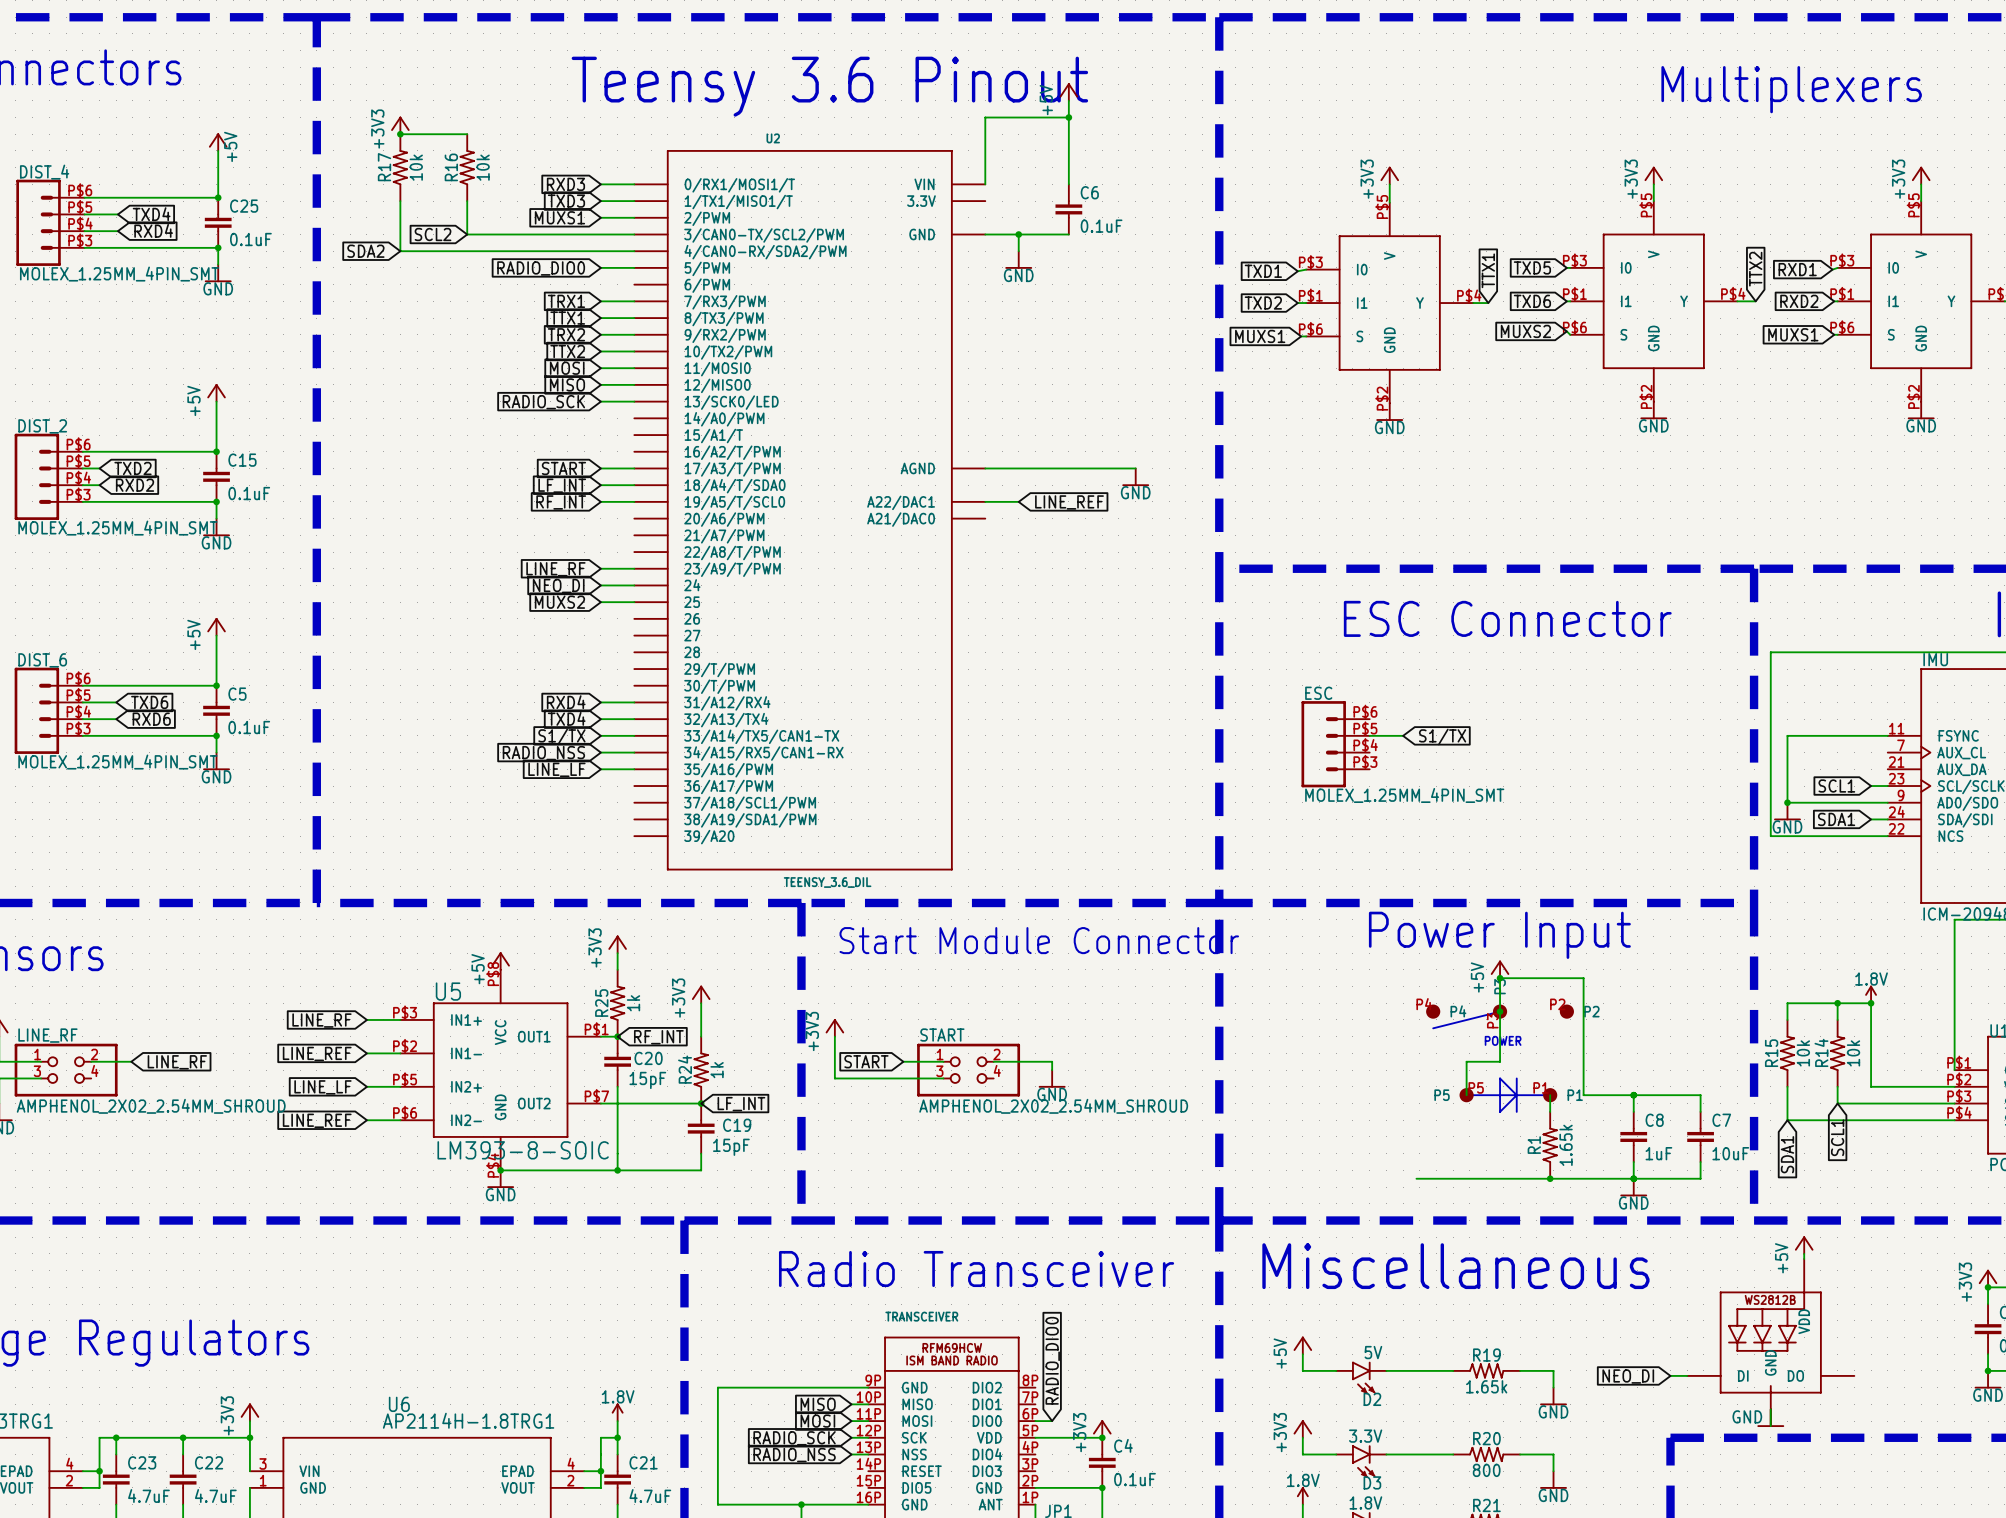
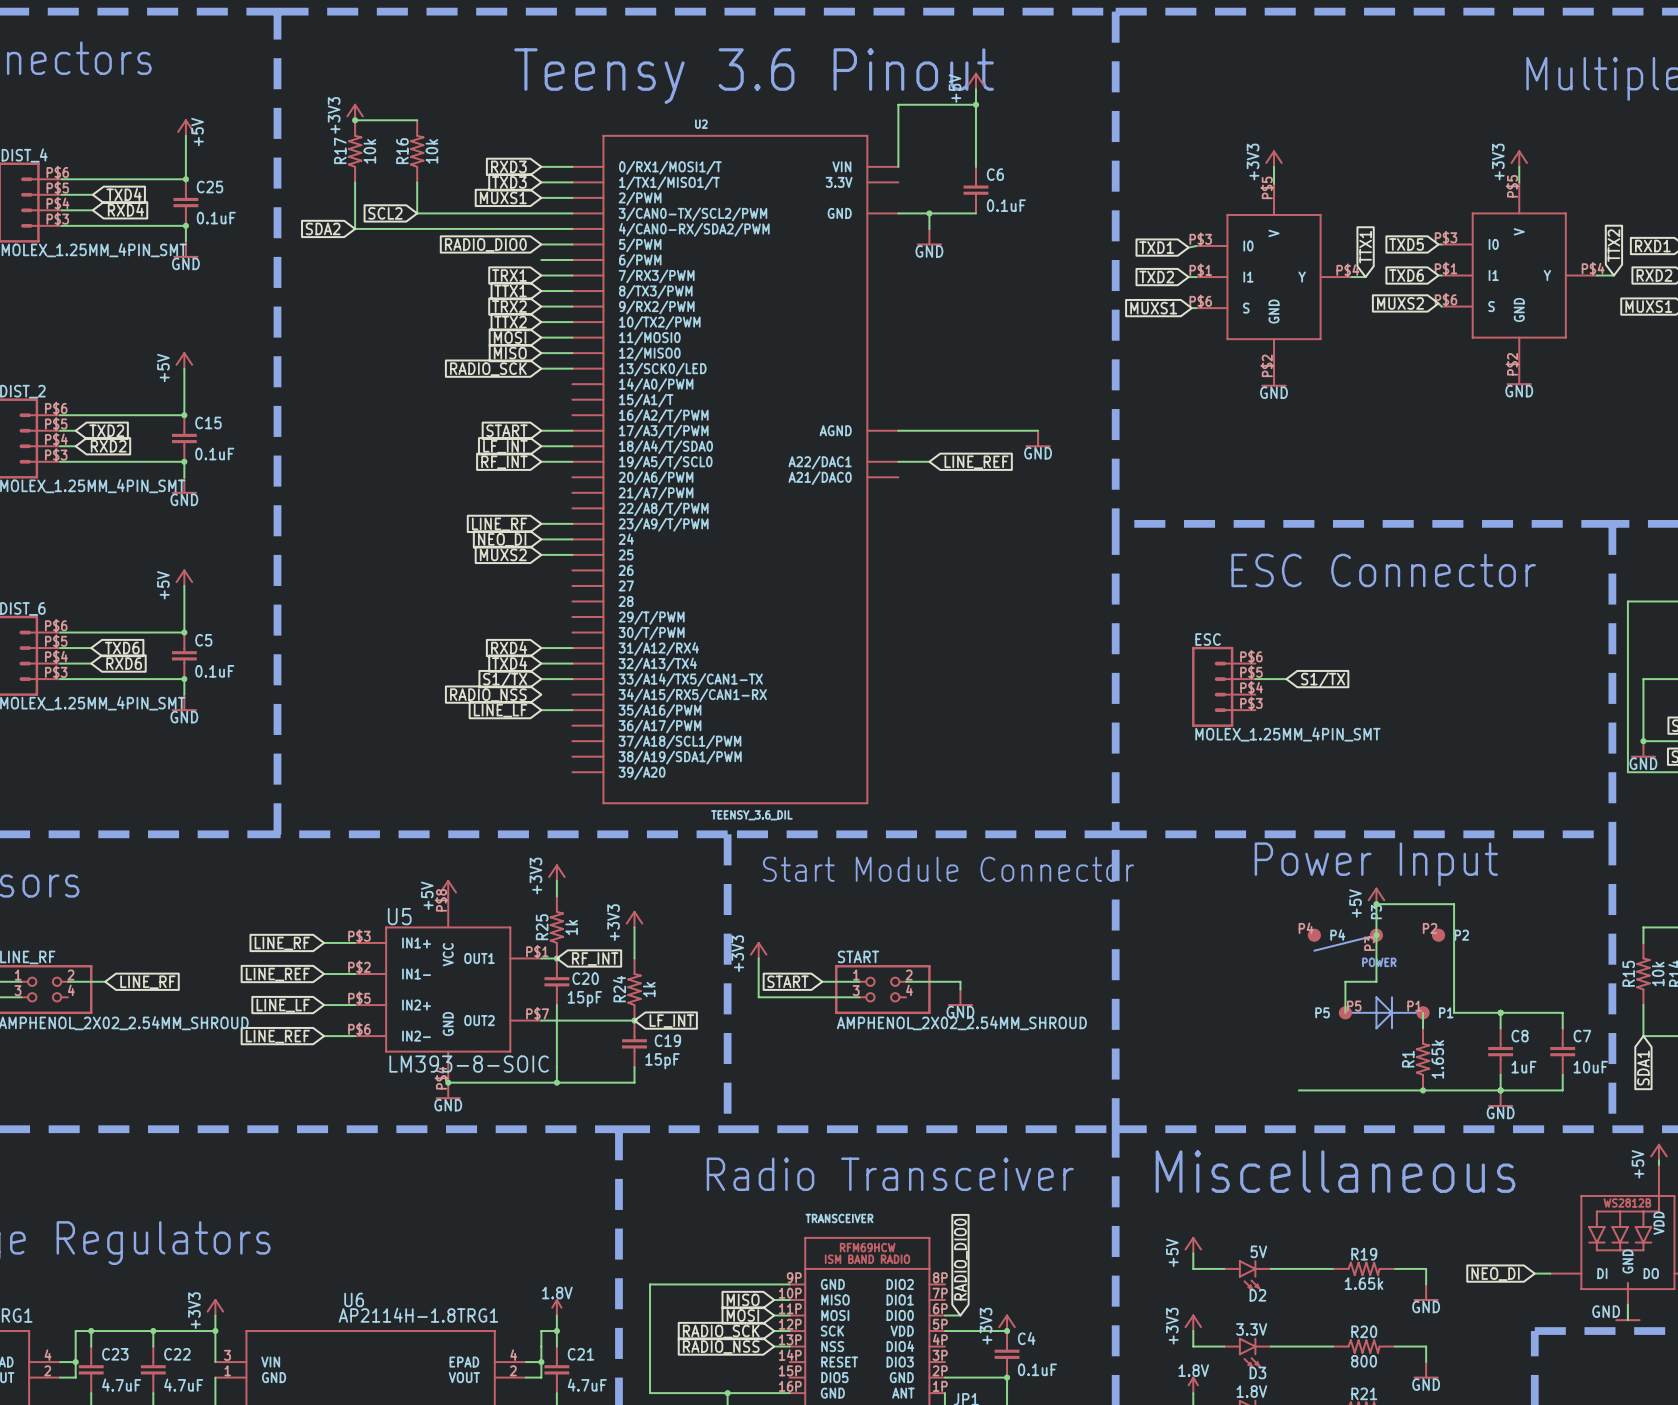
wire: none -> (541, 259) (572, 259)
wire: (600, 752) (634, 752) -> none

